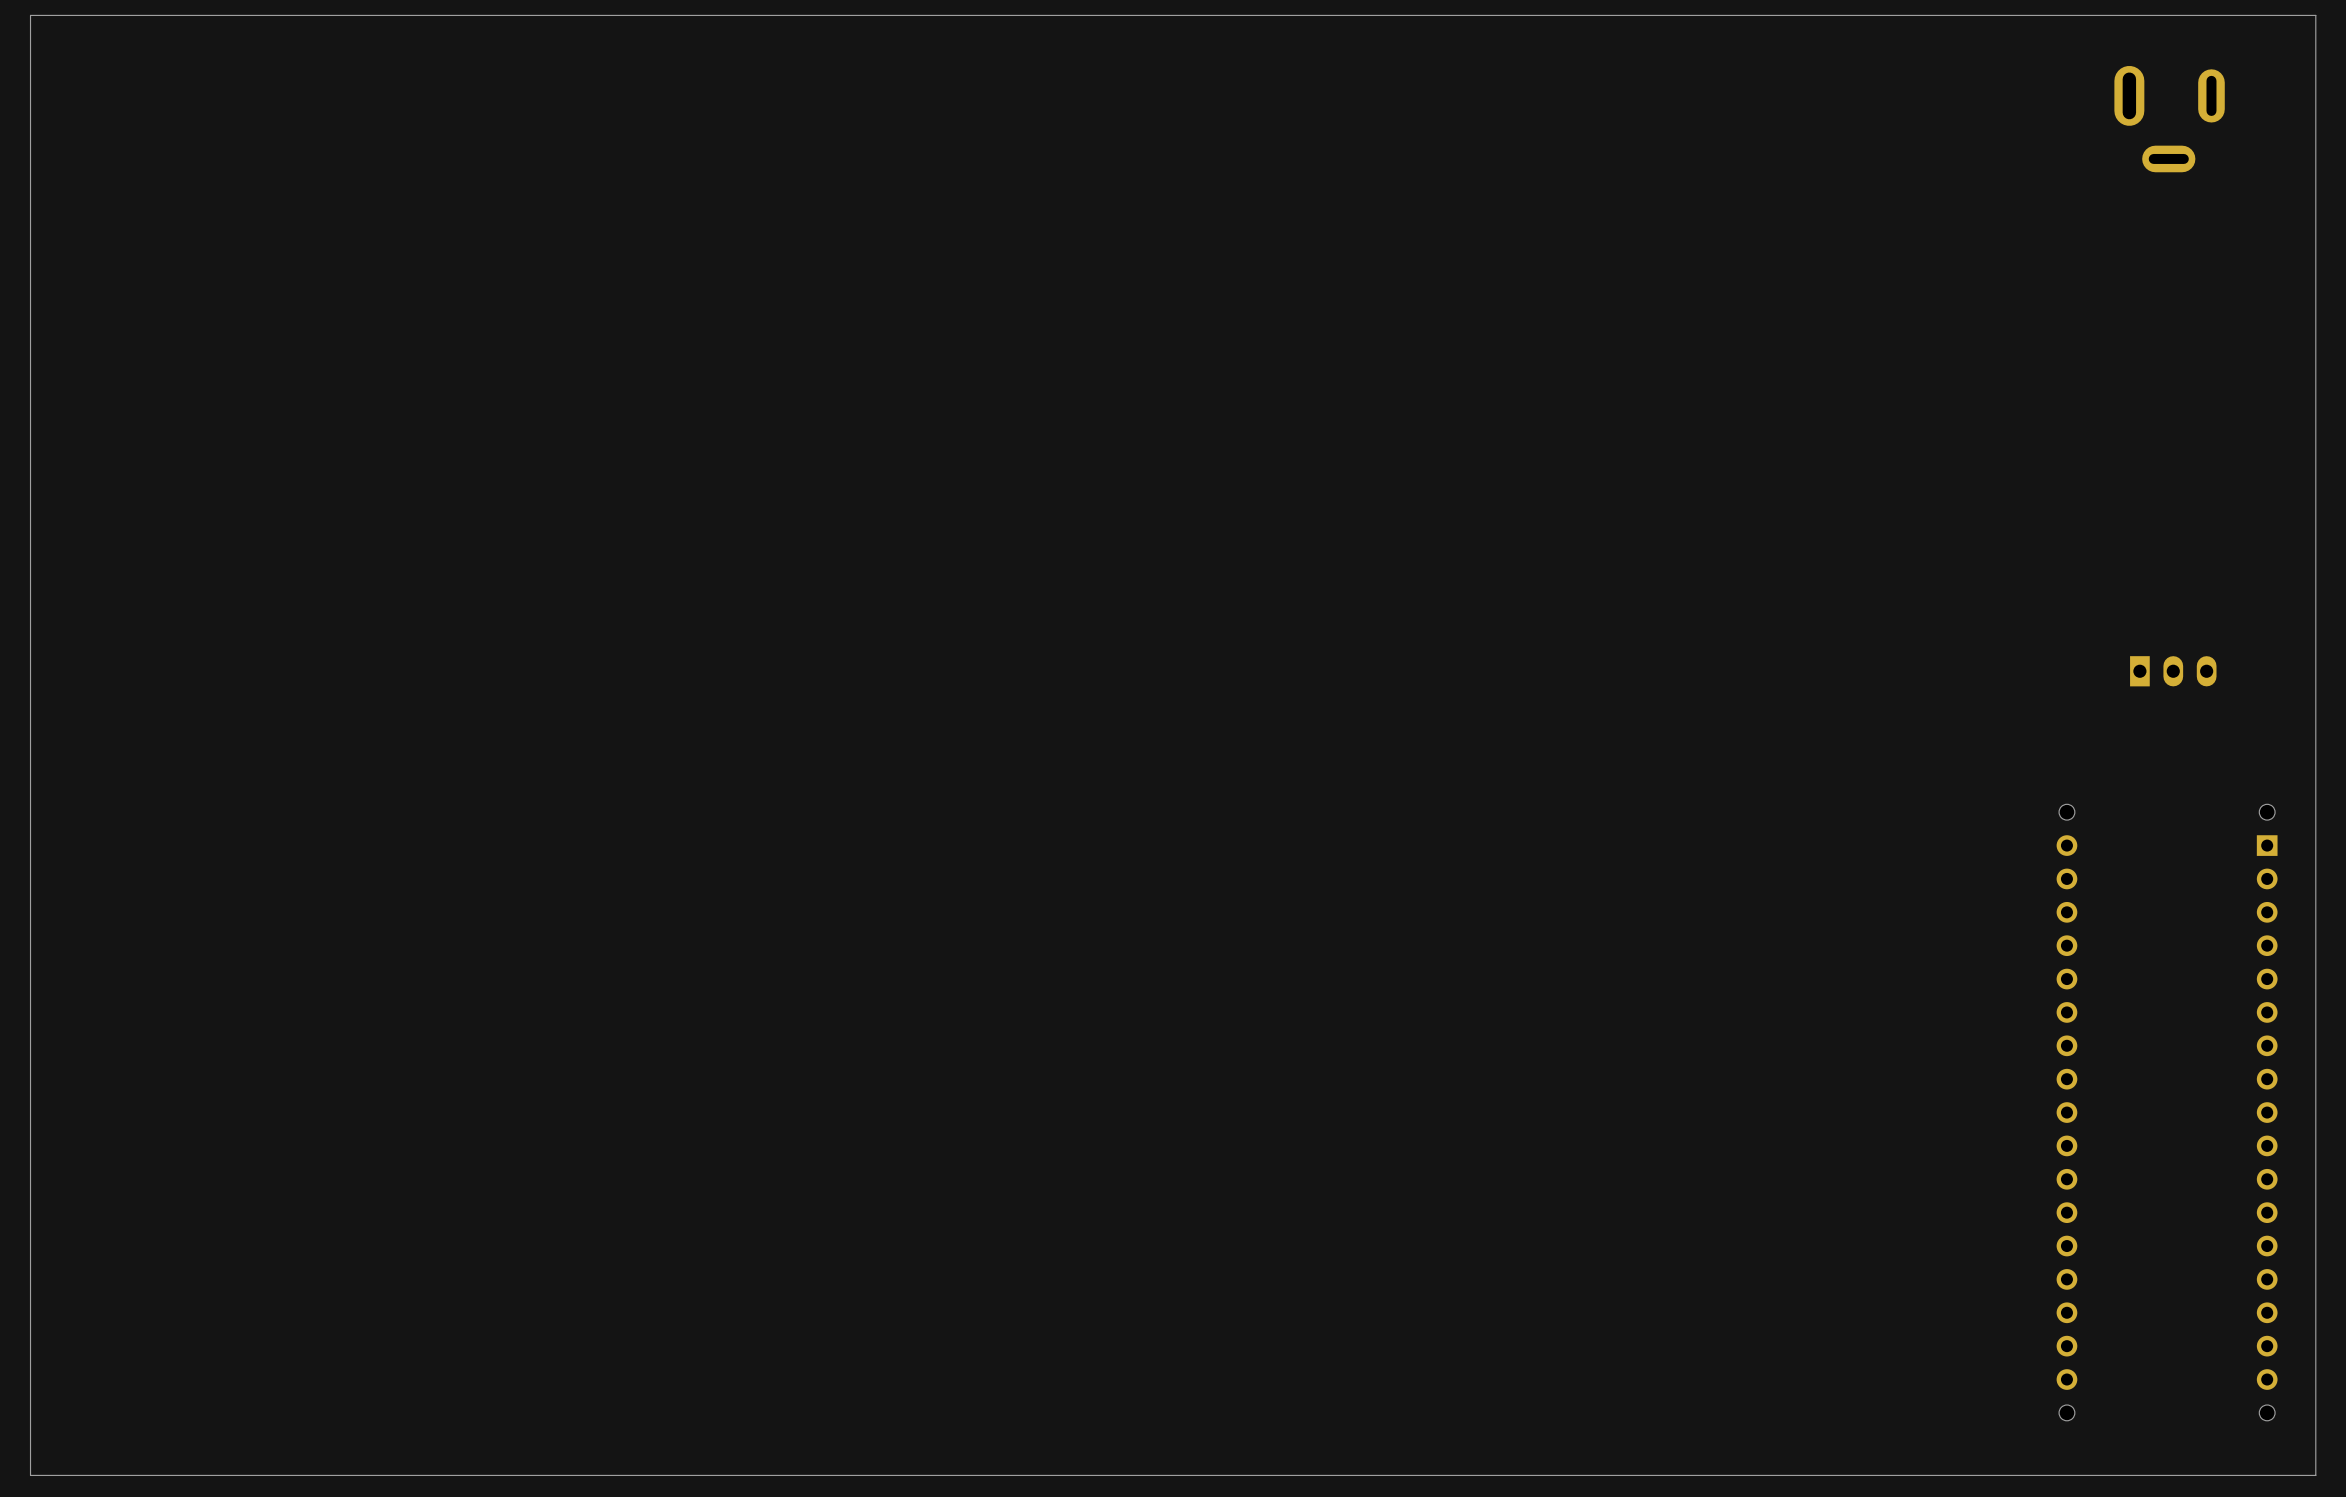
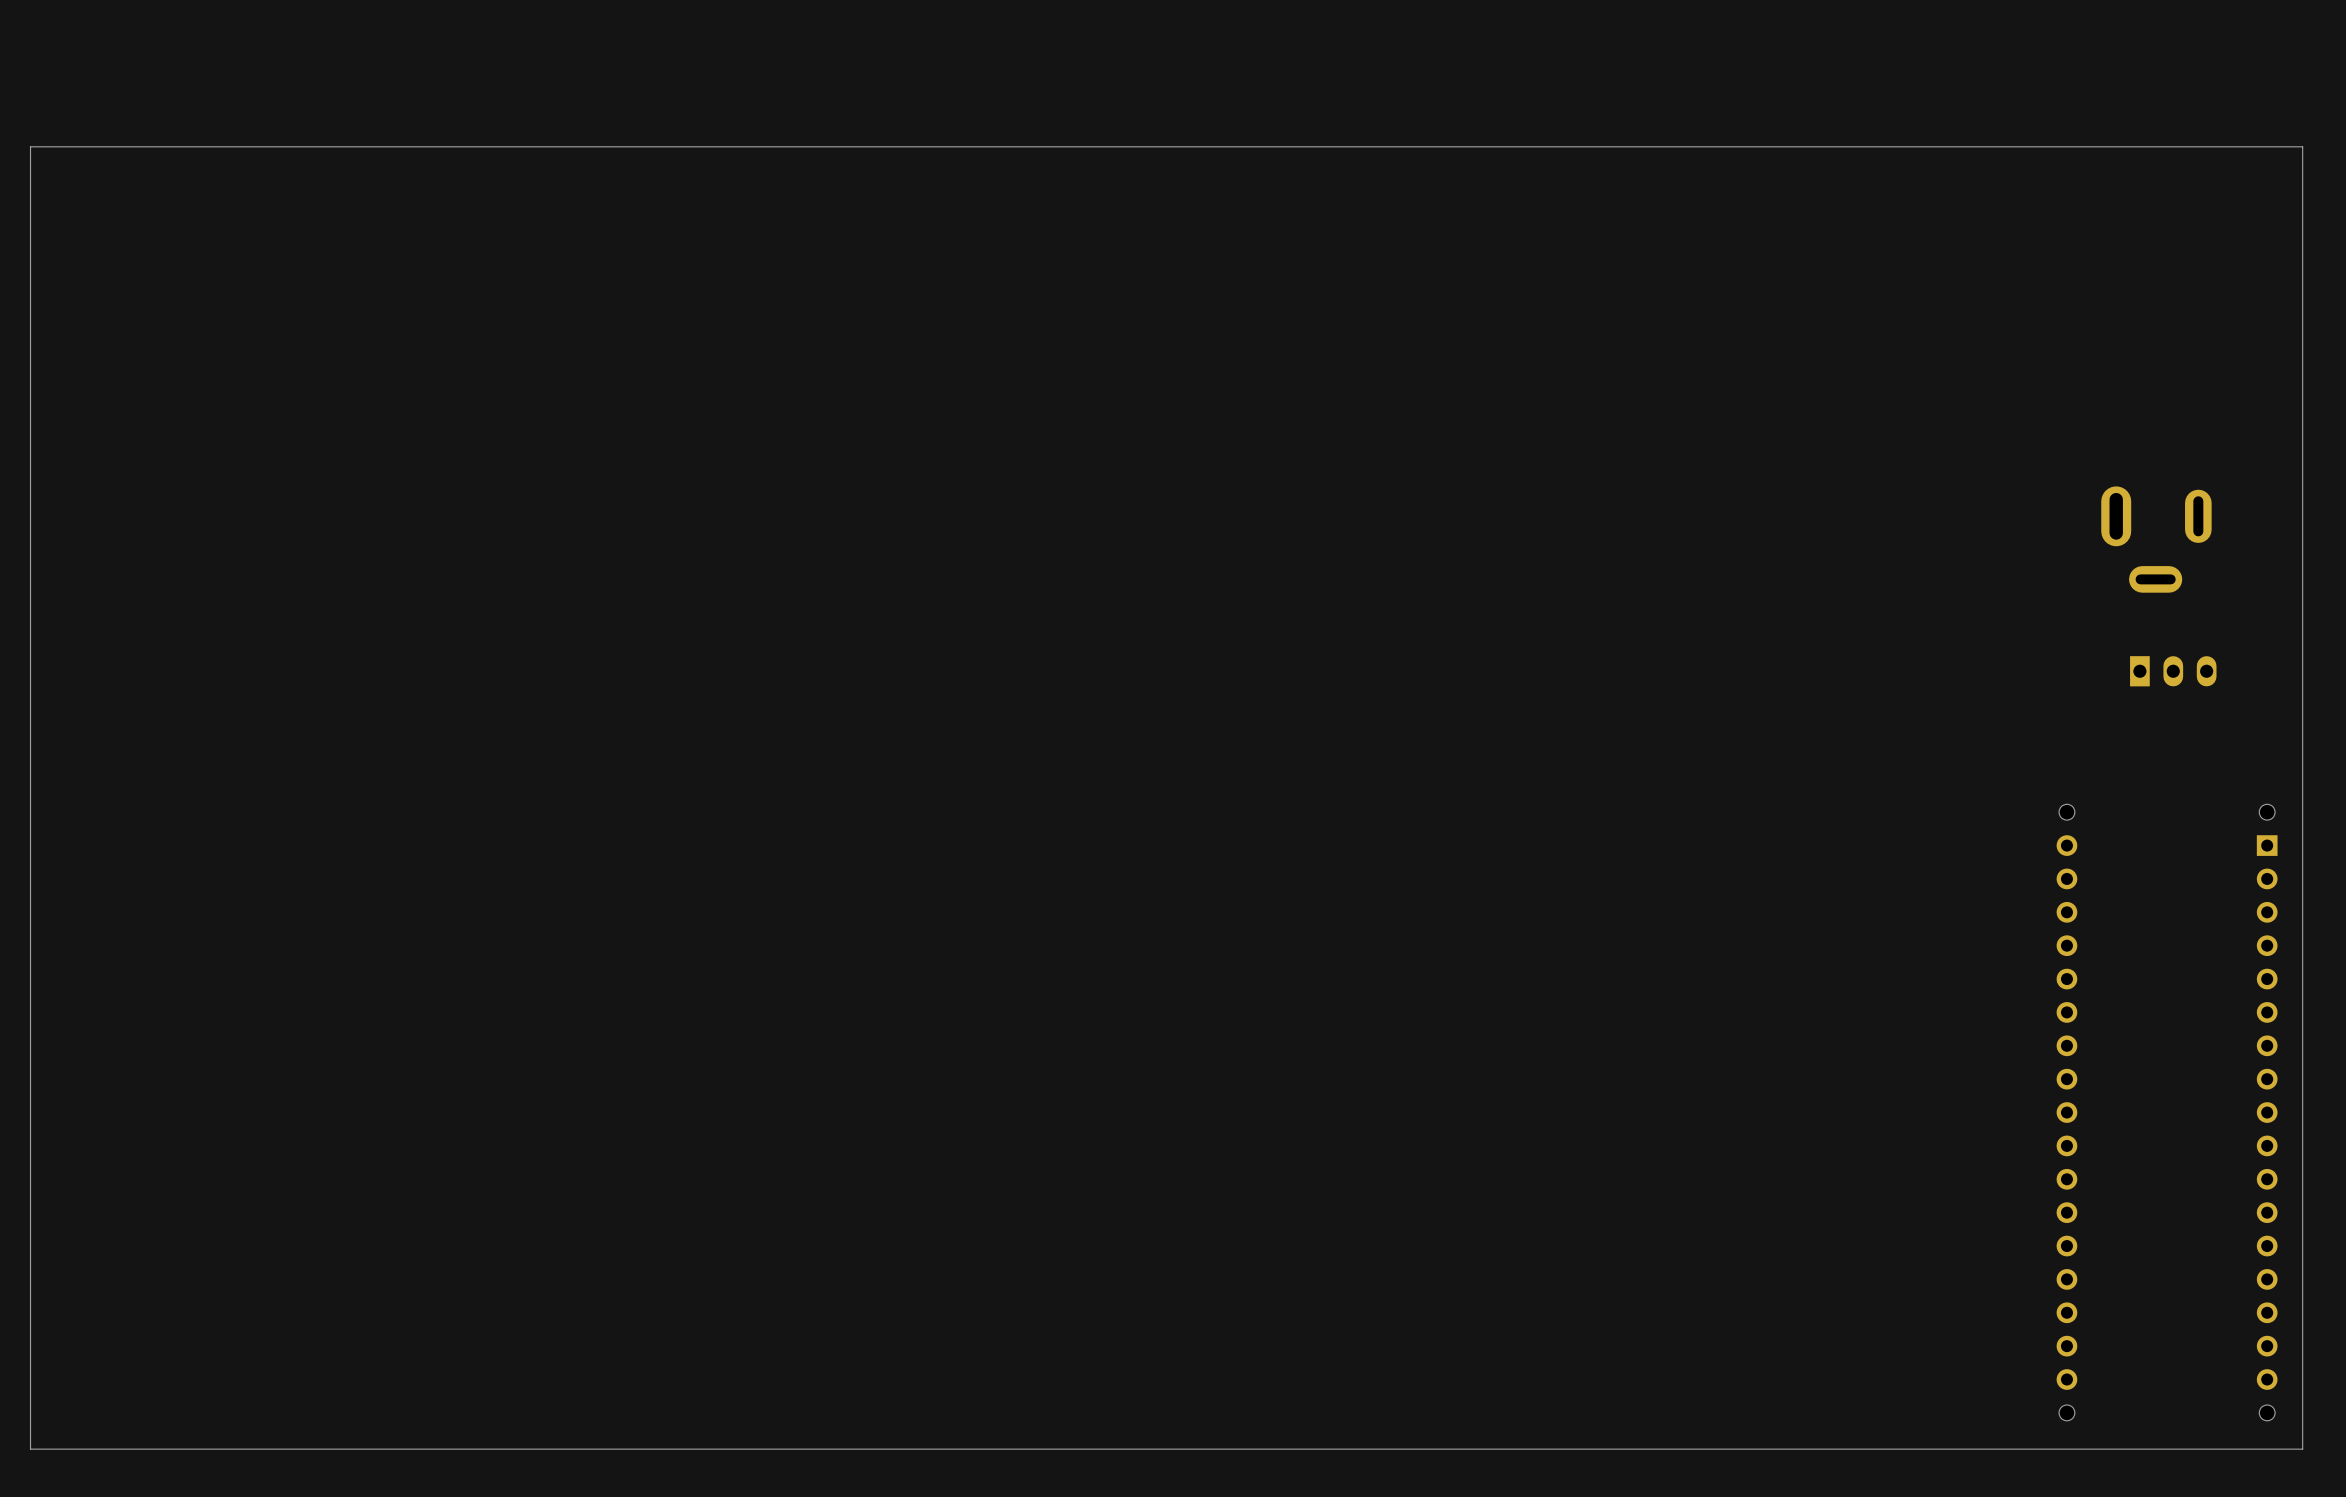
part: (2169, 119) -> none
board edge: (30, 146) (30, 15) (2315, 15) (2315, 1475) (30, 1475) (30, 1449) -> (30, 146) (2302, 146) (2302, 1449) (30, 1449)
part: none -> (2156, 539)

